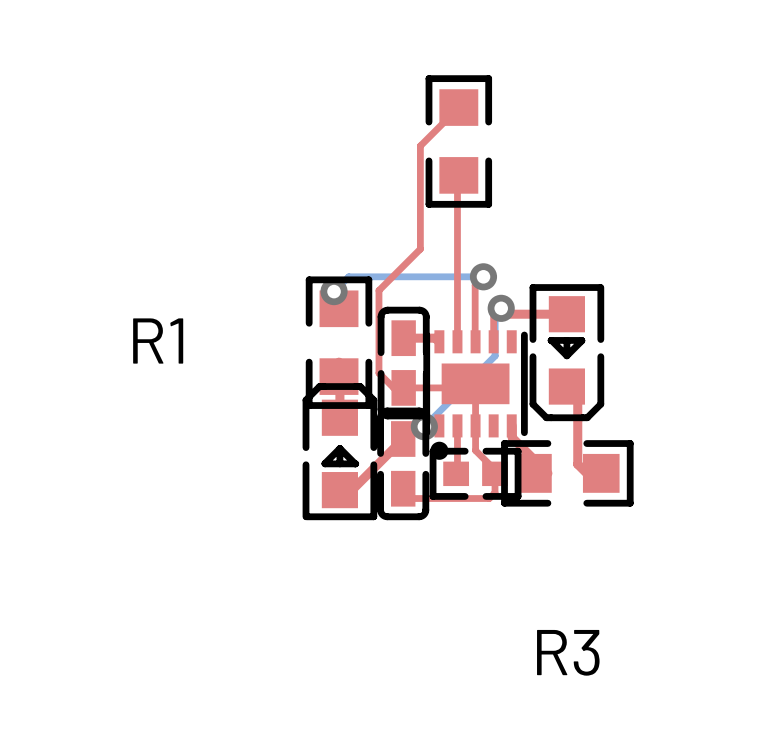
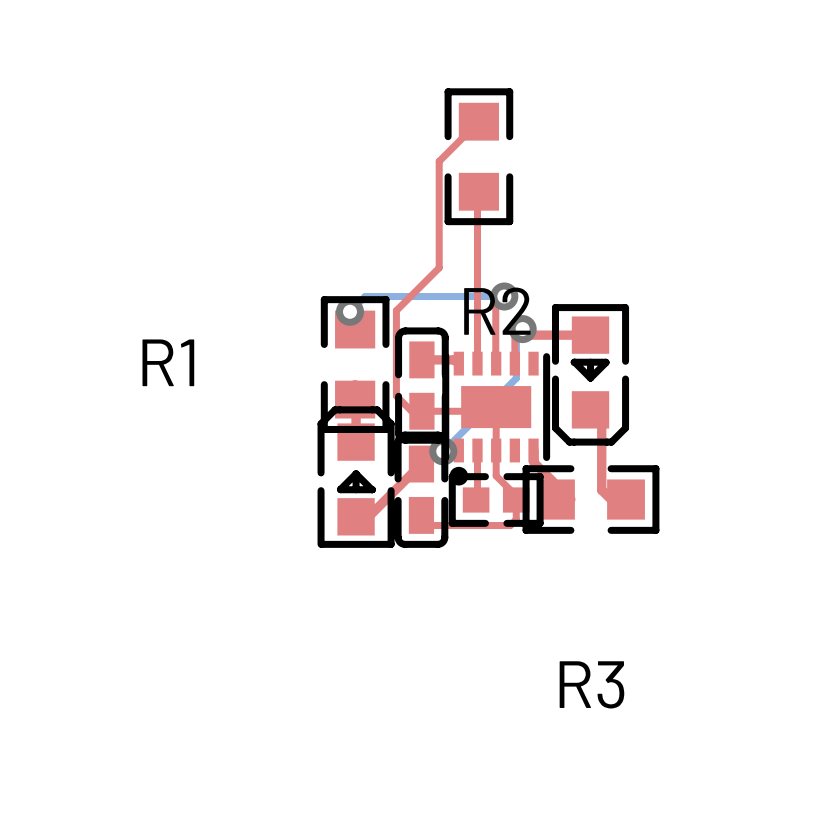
R2 name: none -> R2 (497, 311)

